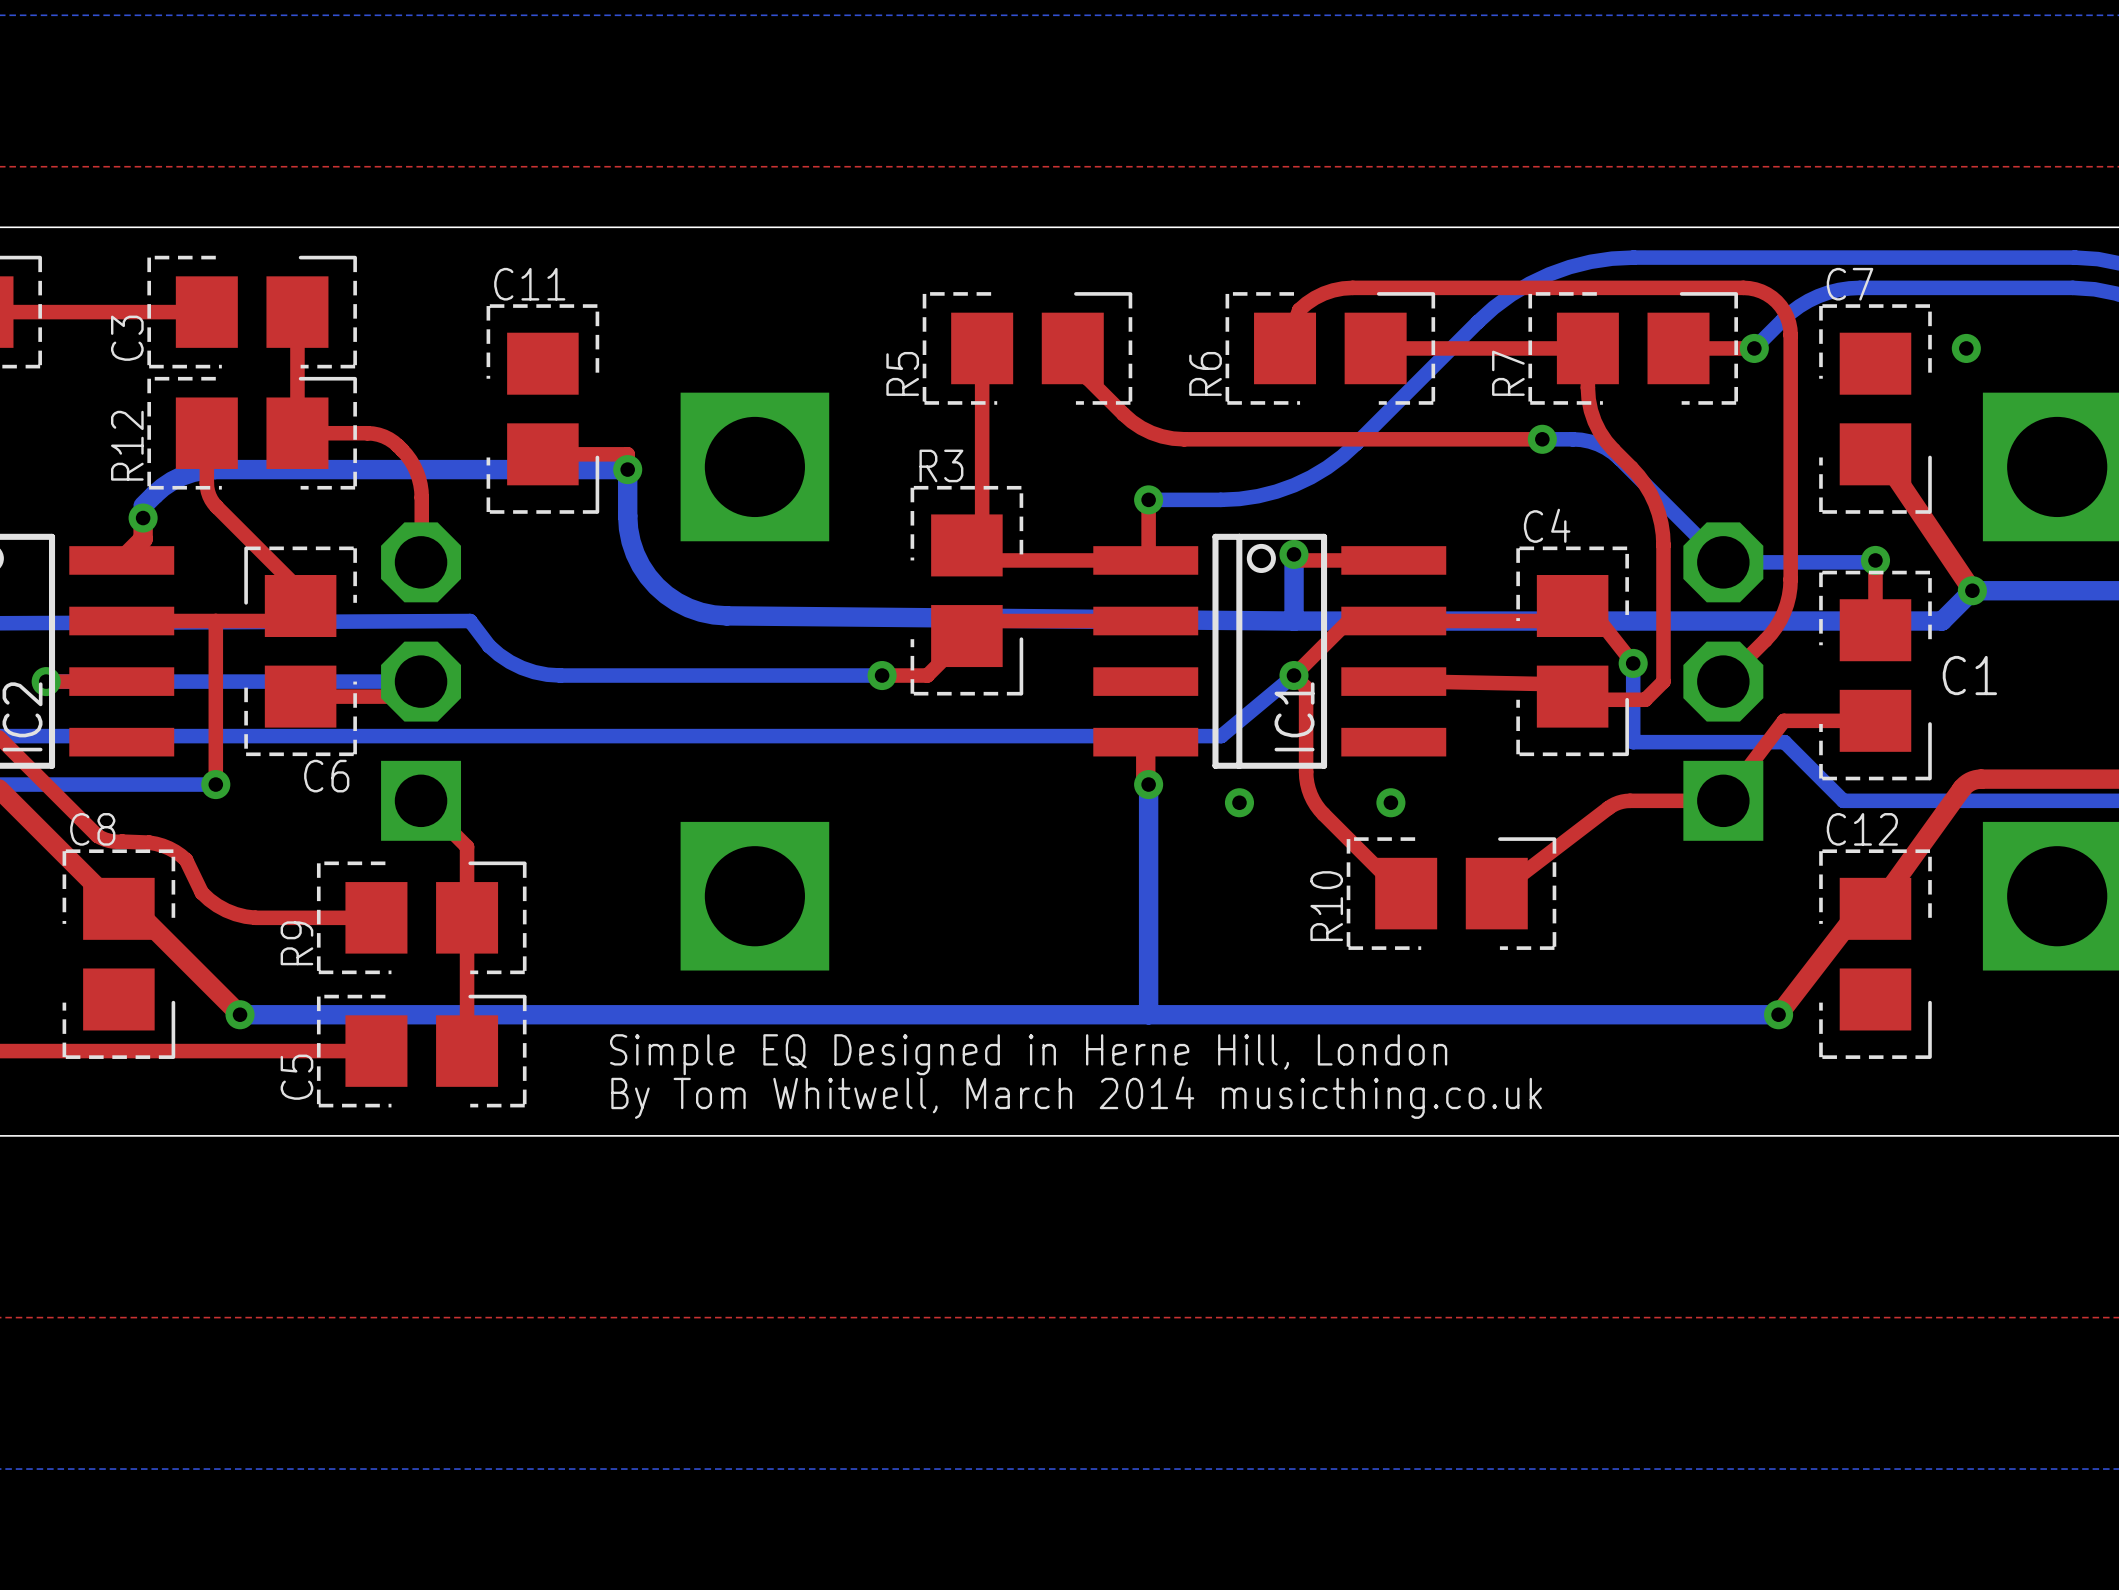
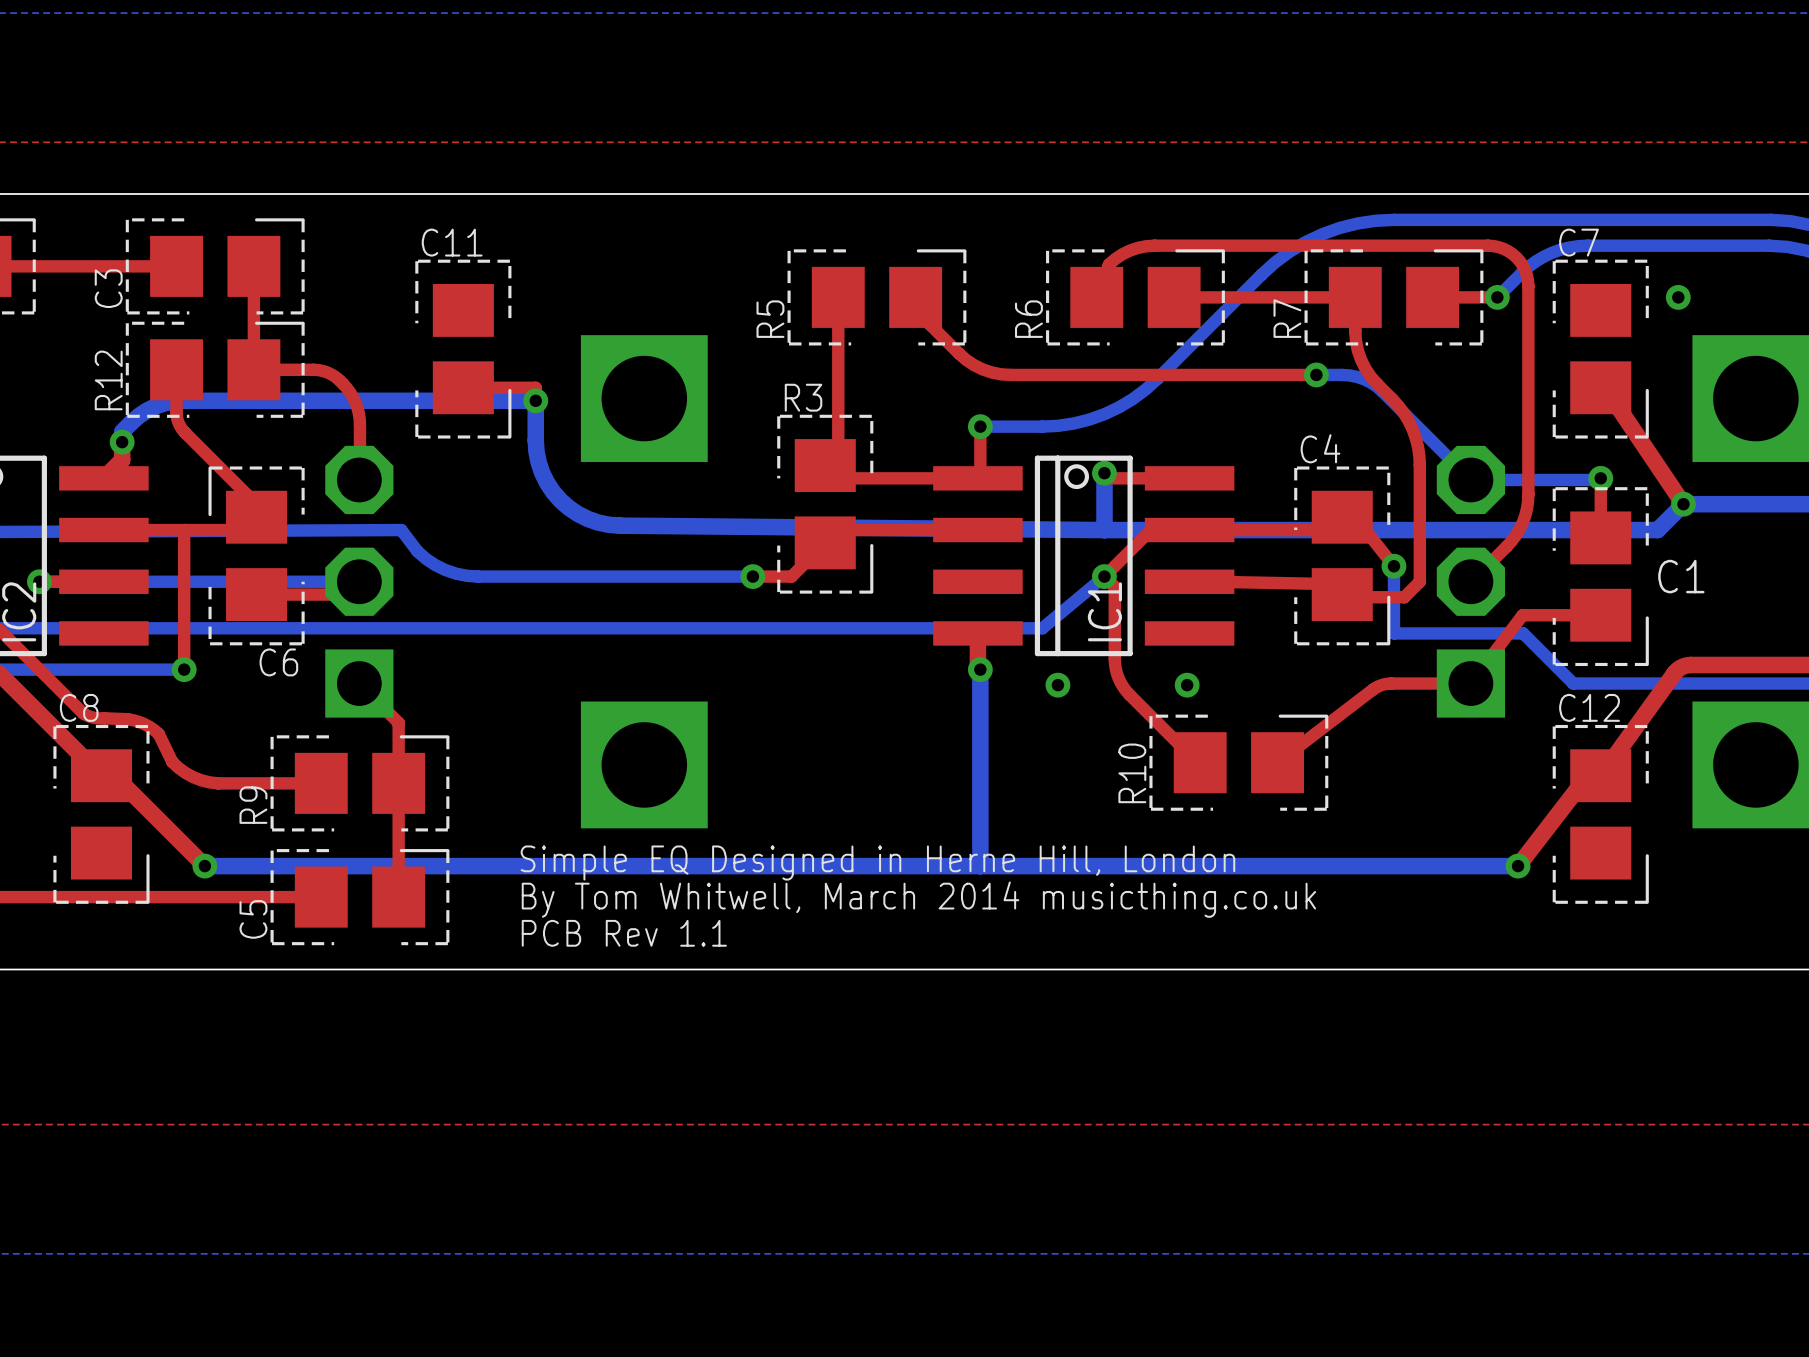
text position: Simple EQ Designed in Herne Hill, London (1028, 1054) -> Simple EQ Designed in Herne Hill, London (877, 862)
text: none -> PCB Rev 1.1 (624, 933)
text position: By Tom Whitwell, March 2014 musicthing.co.uk (1076, 1097) -> By Tom Whitwell, March 2014 musicthing.co.uk (918, 899)

